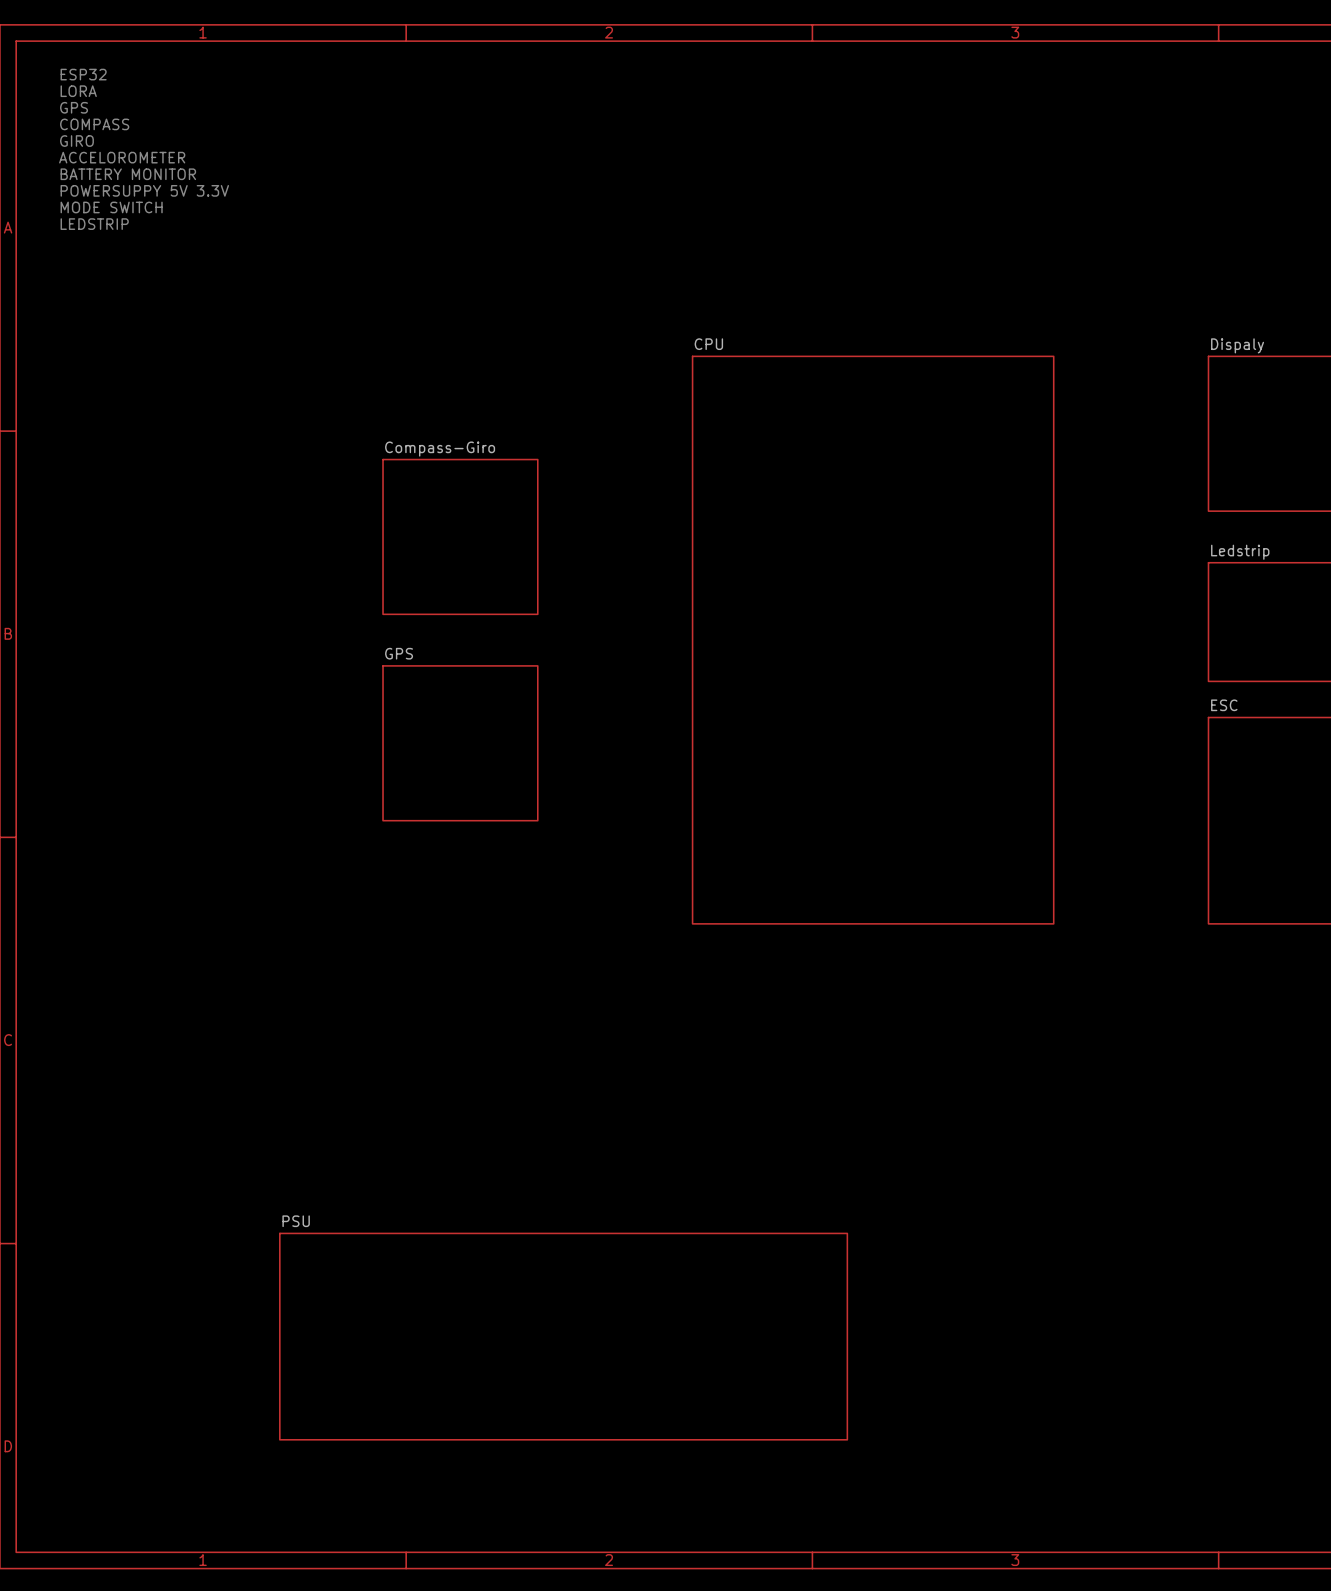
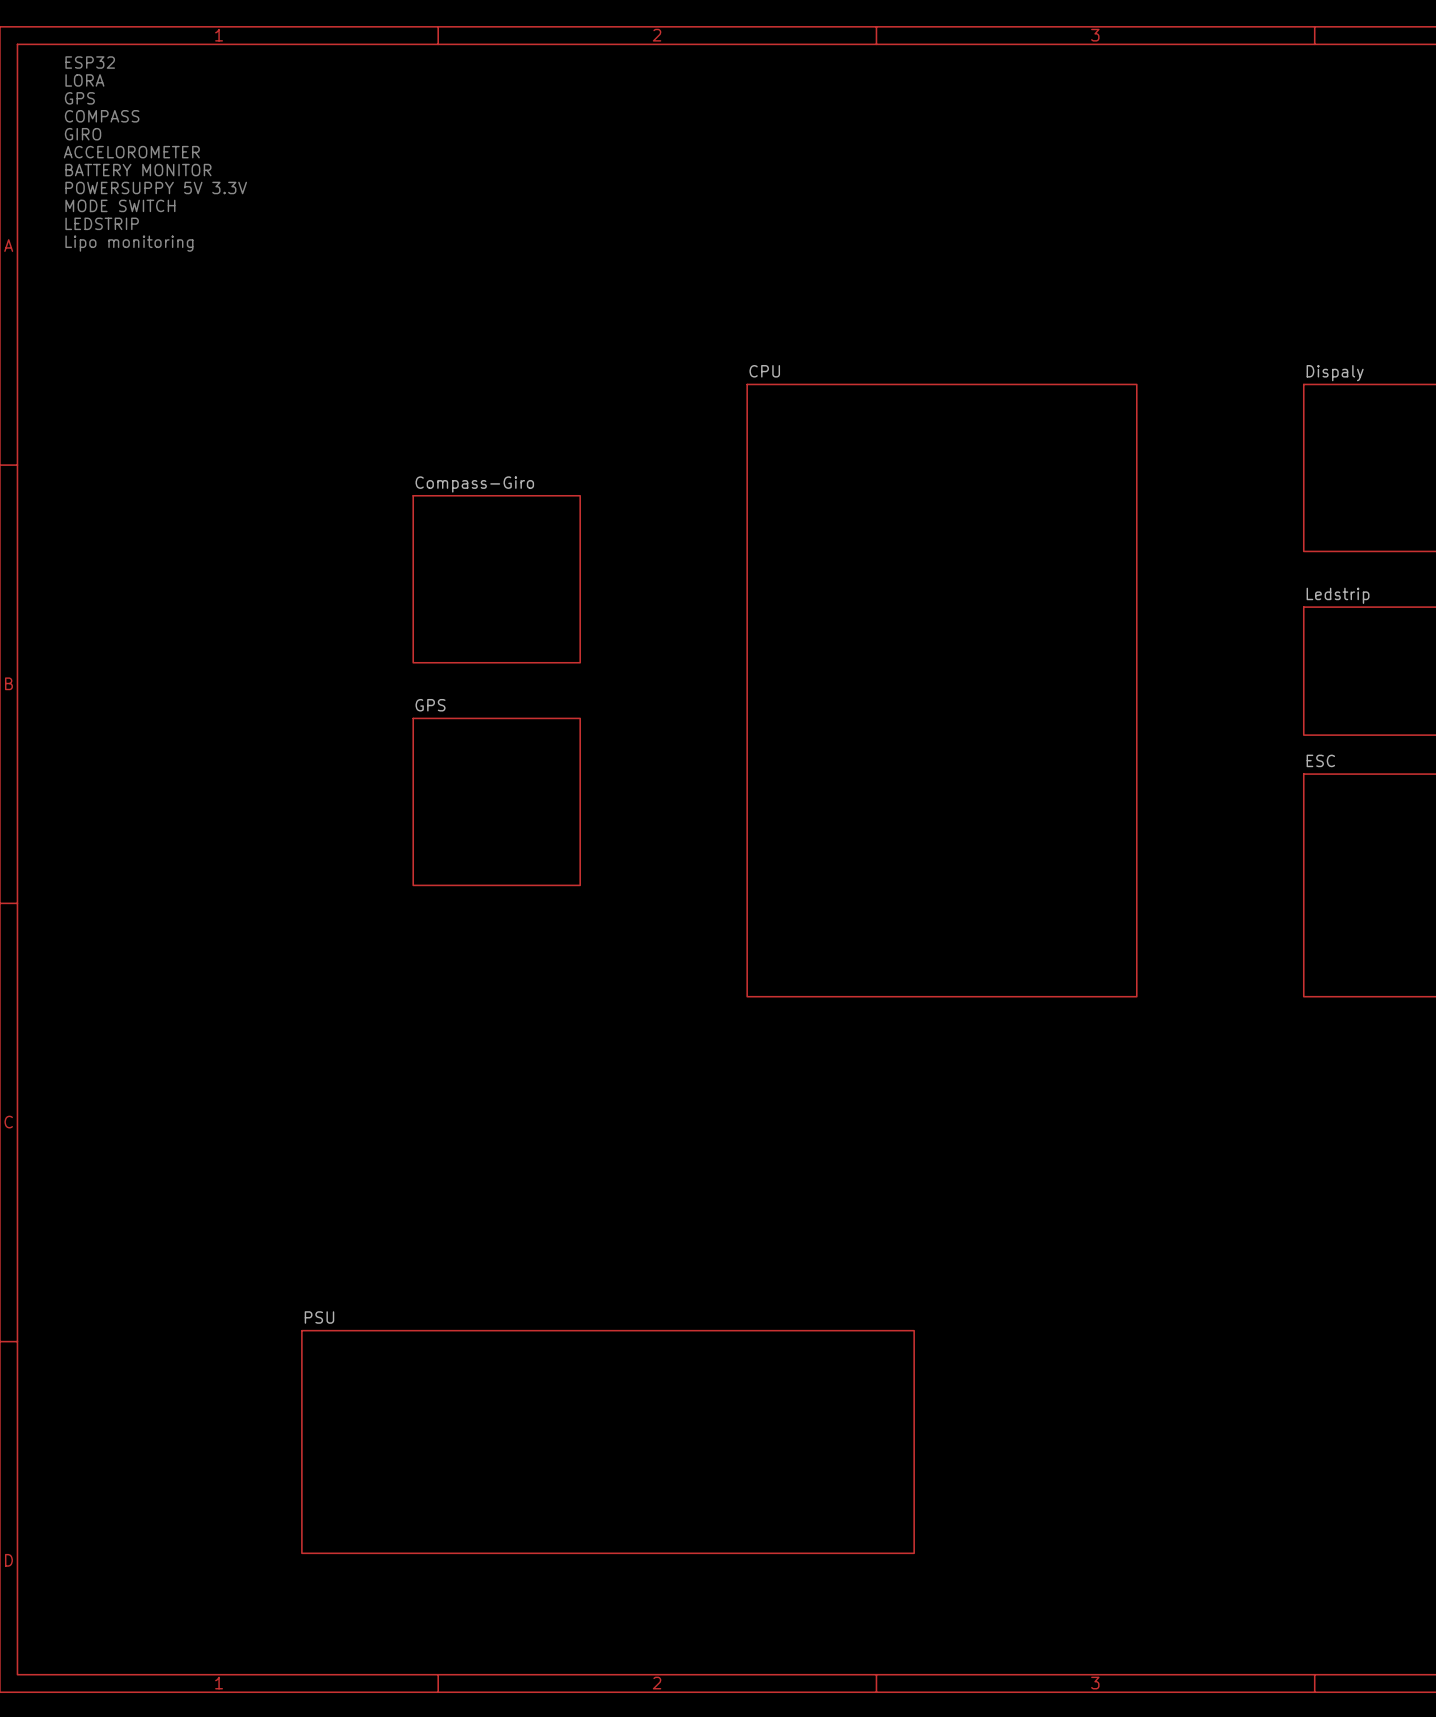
text: none -> ESP32 (90, 62)
text: ESP32 (83, 74) -> LORA (84, 80)
text: LORA (78, 91) -> GPS (79, 98)
text: GPS (74, 107) -> COMPASS (102, 116)
text: COMPASS (94, 124) -> GIRO (83, 134)
text: GIRO (76, 141) -> ACCELOROMETER (131, 152)
text: ACCELOROMETER (122, 157) -> BATTERY MONITOR (138, 170)
text: BATTERY MONITOR (128, 174) -> POWERSUPPY 5V 3.3V (156, 187)
text: POWERSUPPY 5V 3.3V (144, 190) -> MODE SWITCH (120, 205)
text: MODE SWITCH (111, 207) -> LEDSTRIP (102, 223)
text: LEDSTRIP (94, 224) -> Lipo monitoring (129, 243)

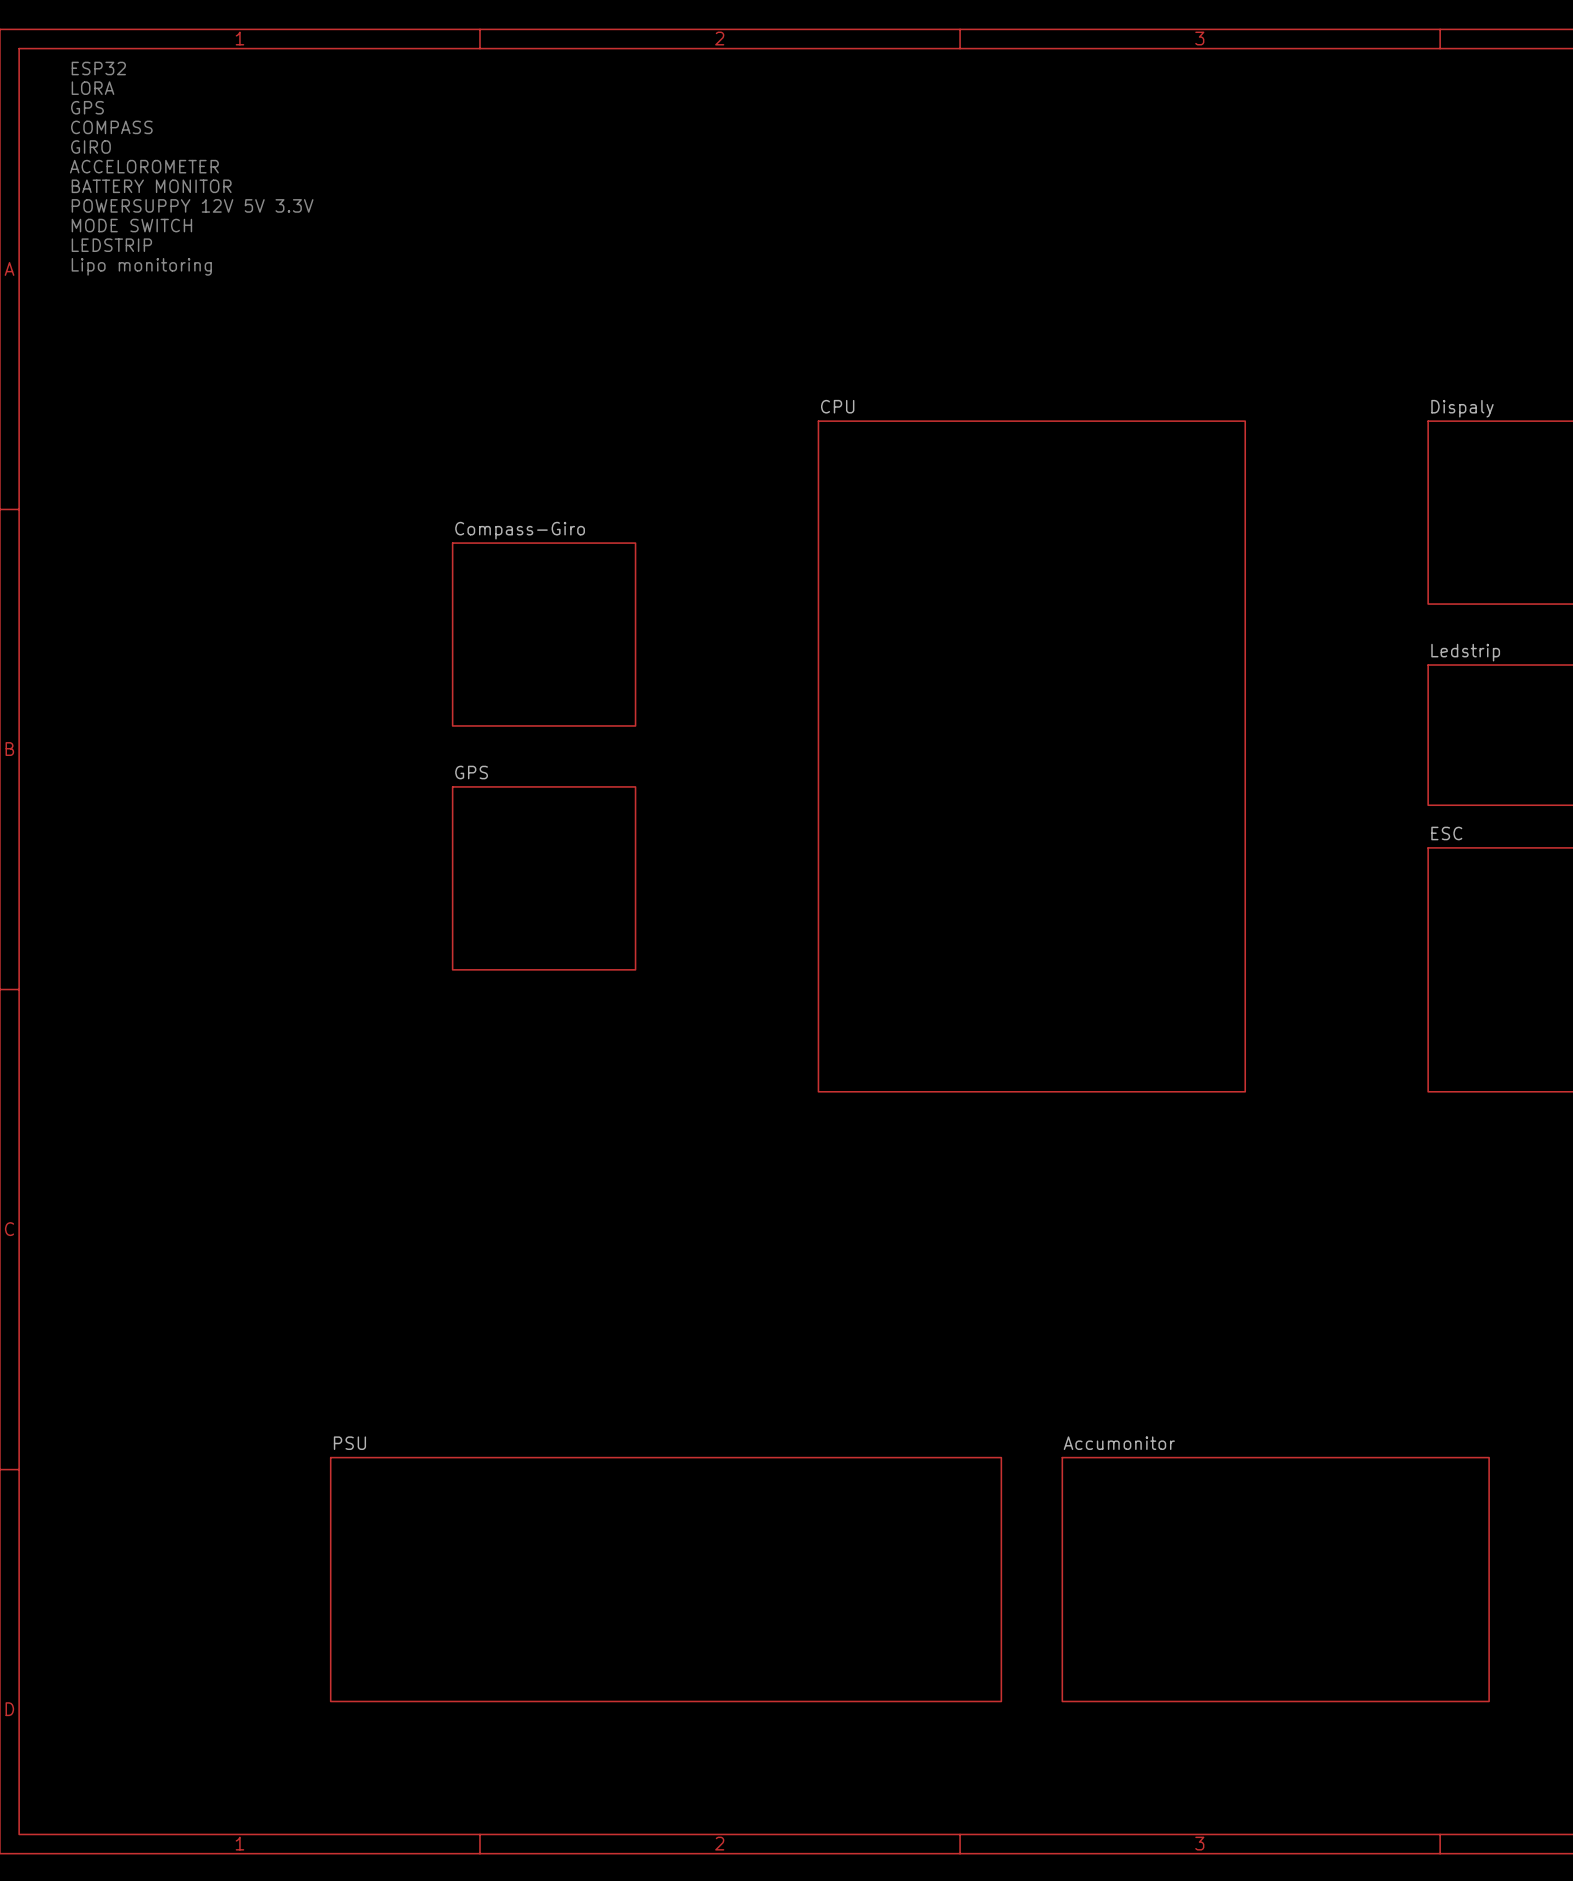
text: POWERSUPPY 5V 3.3V (156, 187) -> POWERSUPPY 12V 5V 3.3V (192, 205)
sheet Accumonitor: none -> (1275, 1579)

